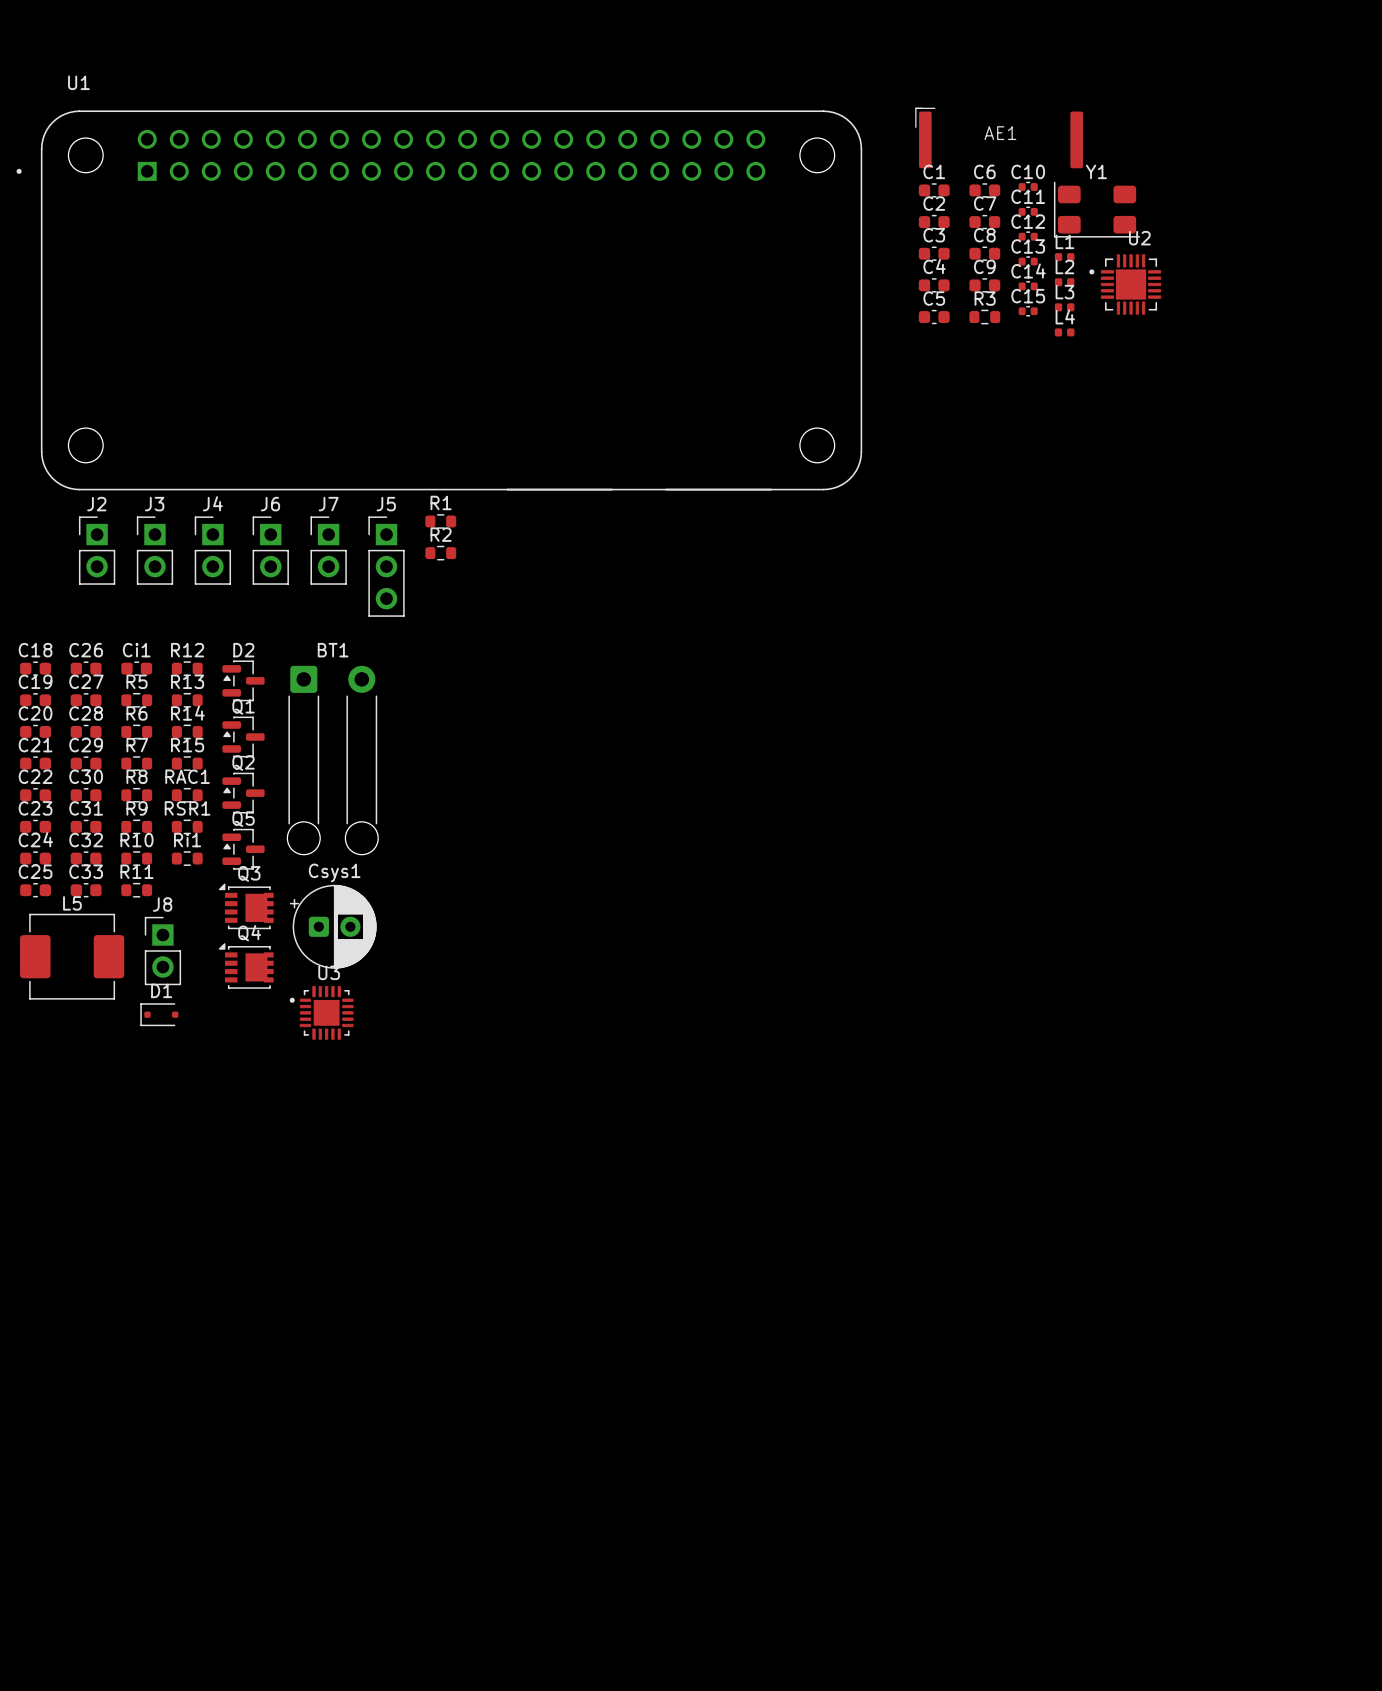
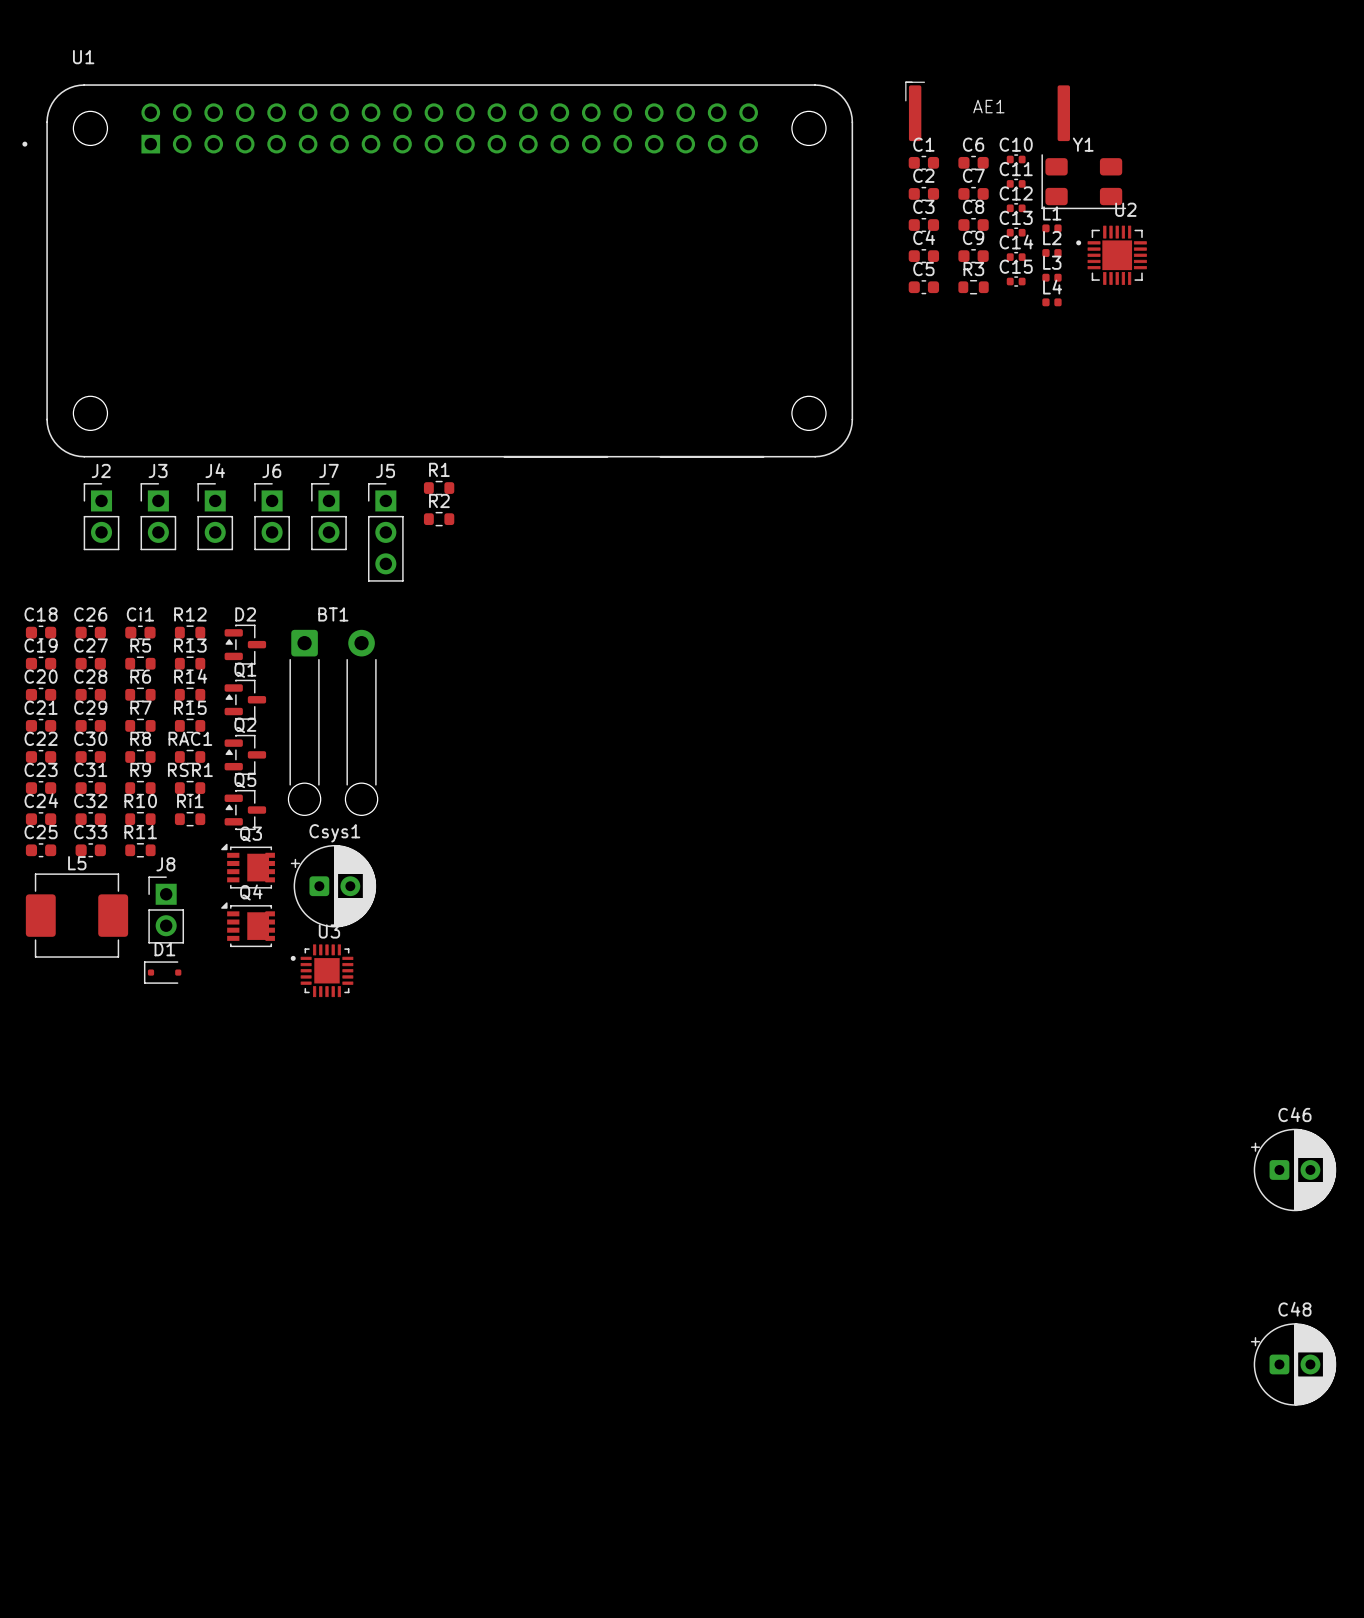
C46: none -> (1293, 1169)
C48: none -> (1293, 1364)

